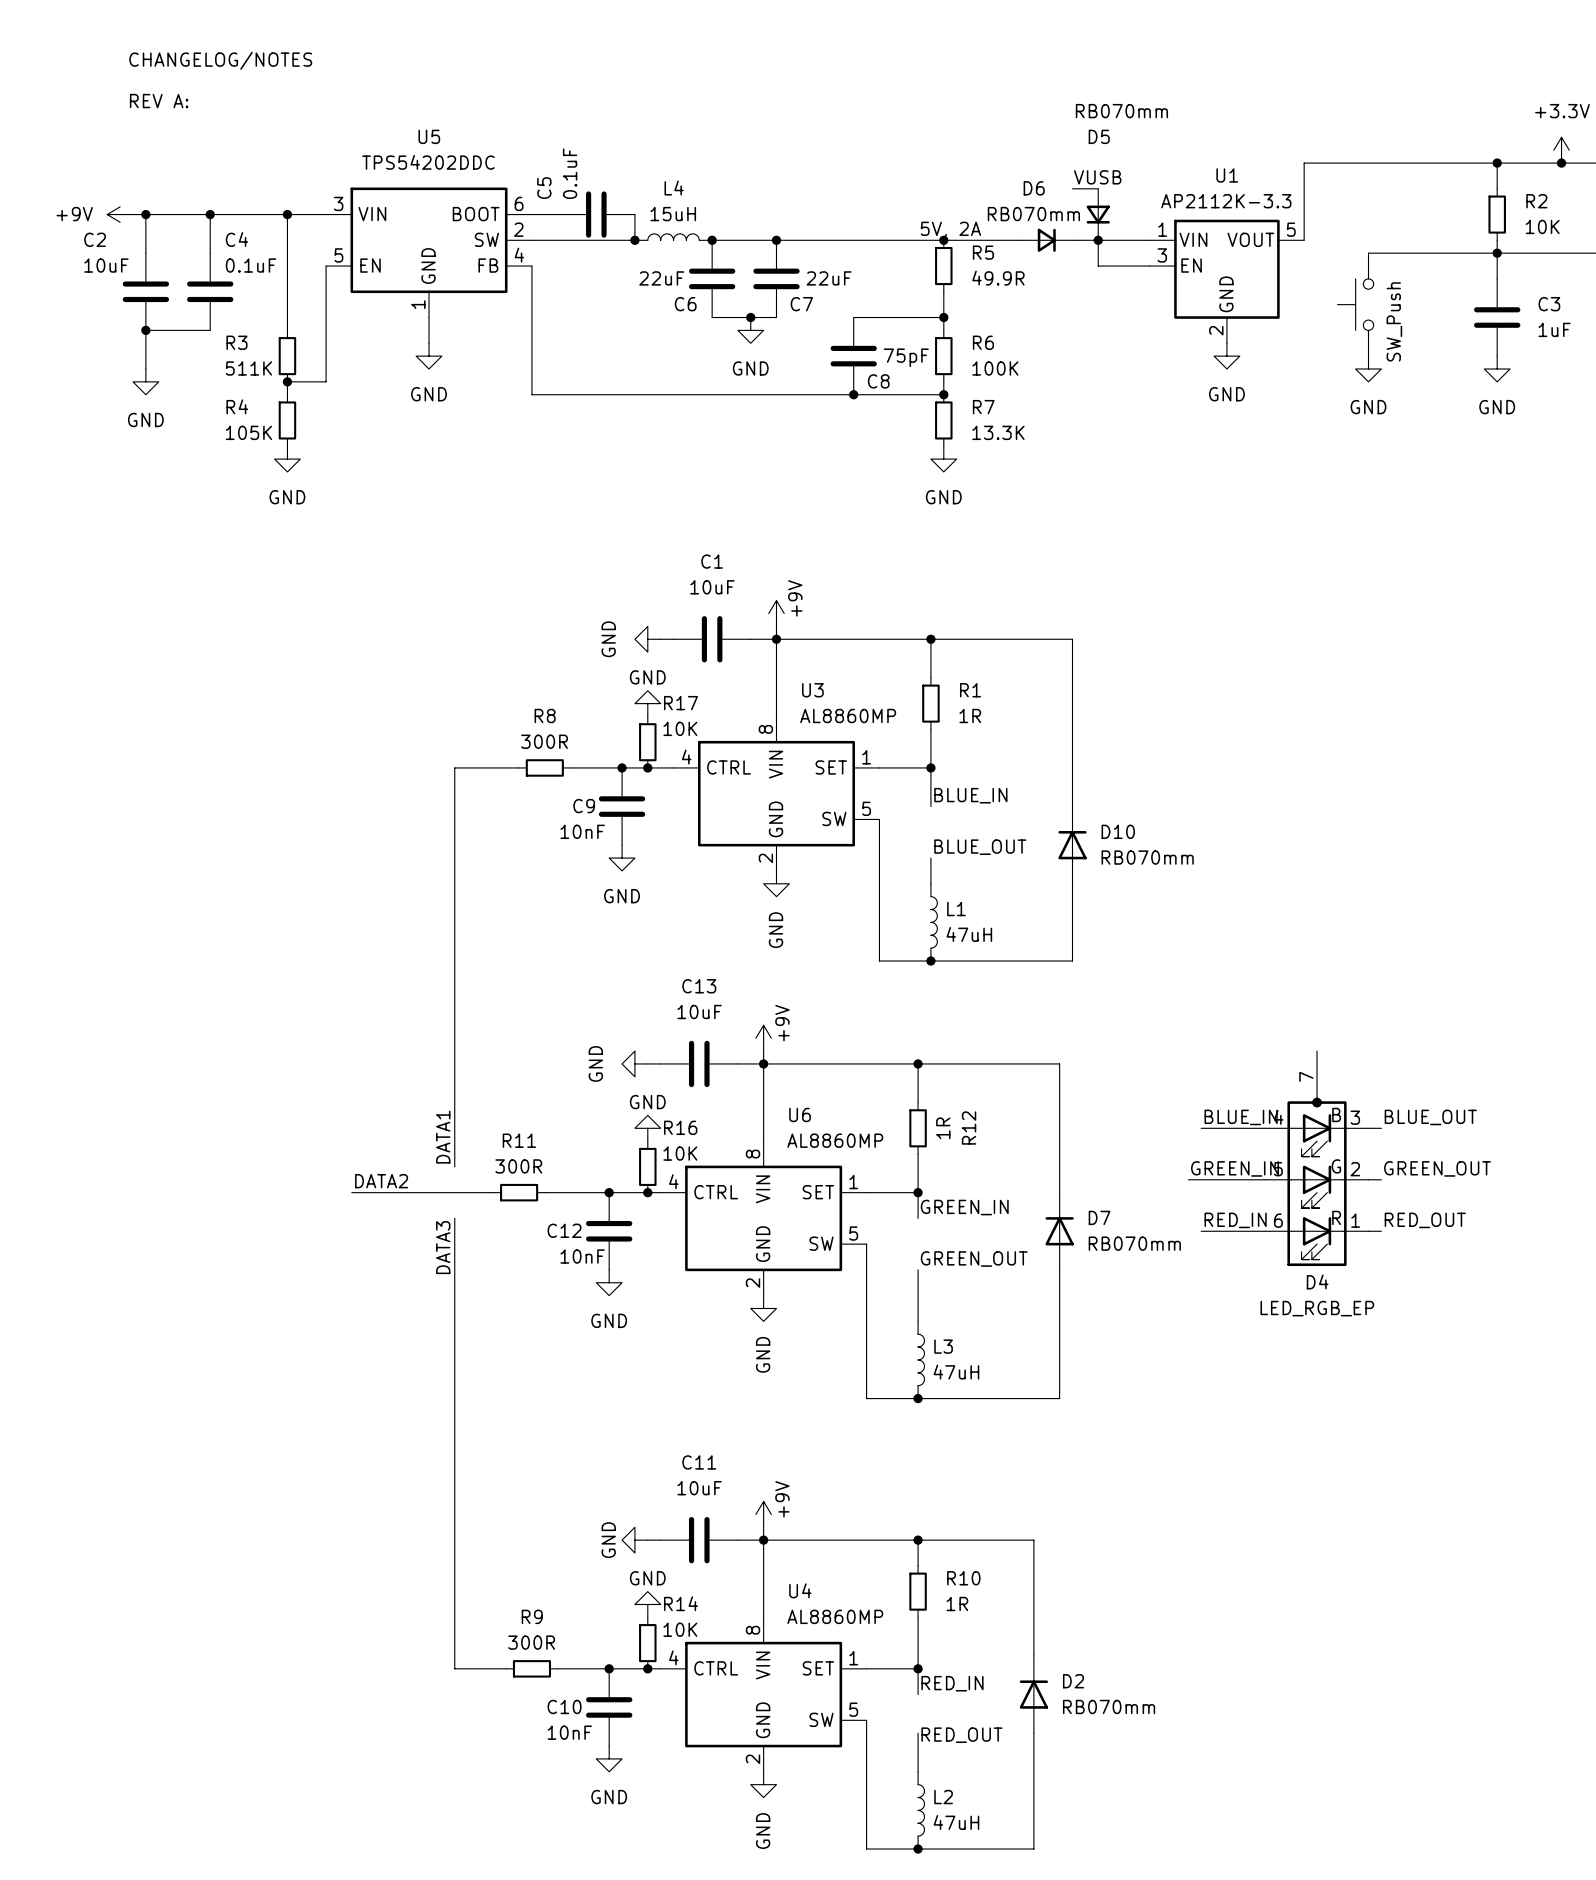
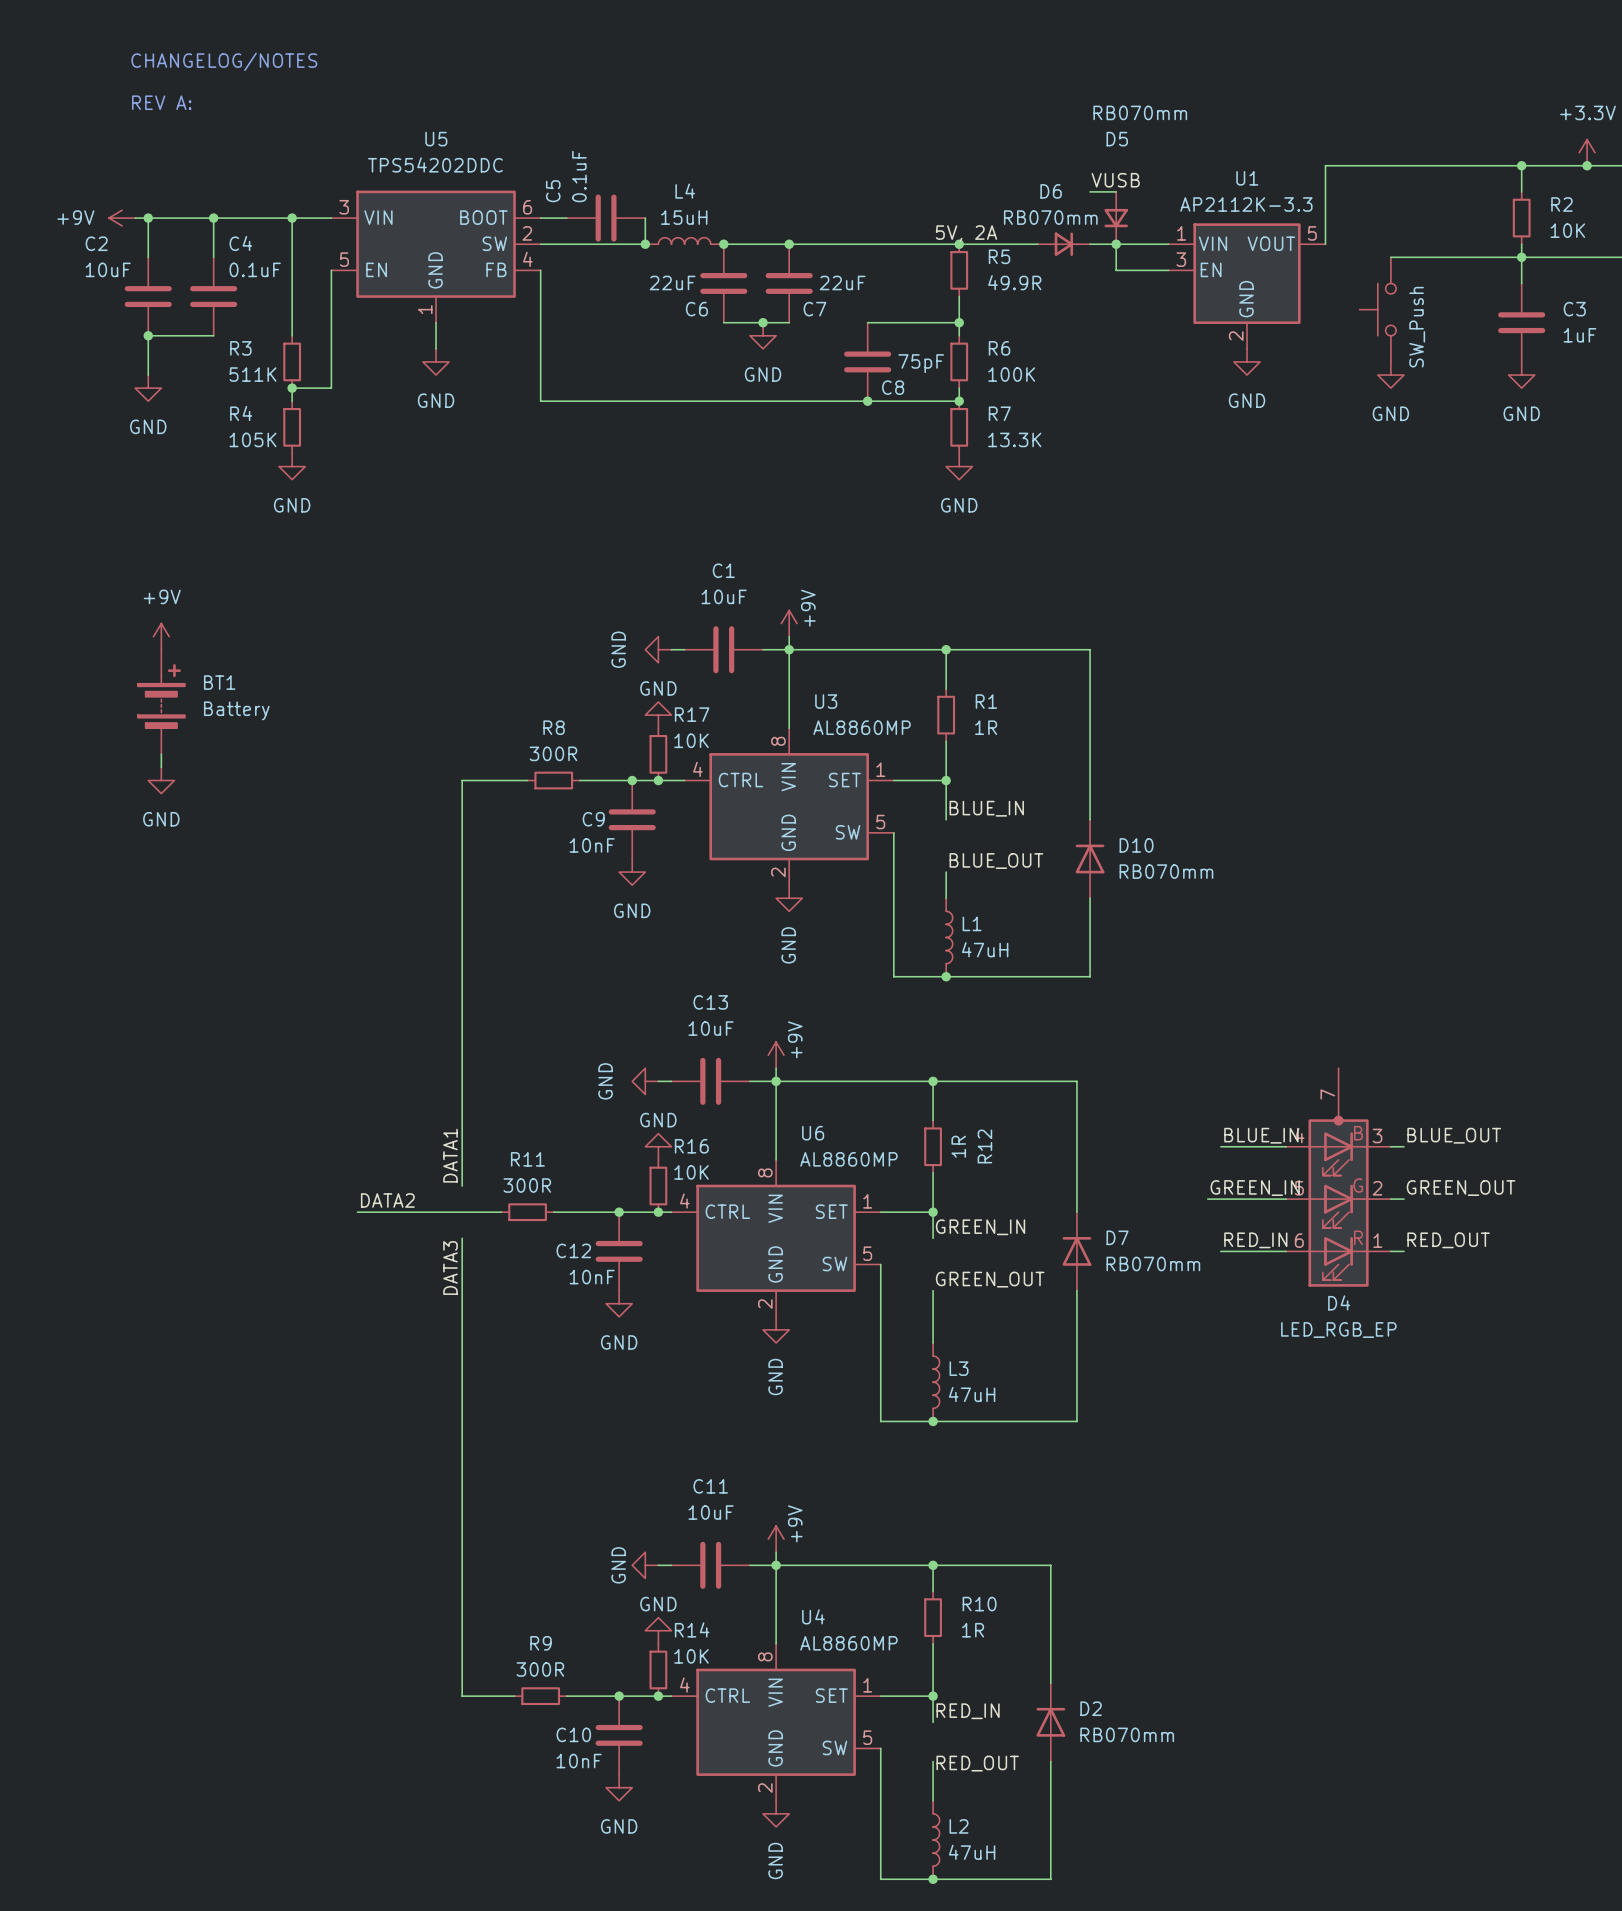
power symbol: none -> +9V (161, 636)
BT1: none -> Battery (161, 702)
wire: none -> (161, 754) (161, 767)
power symbol: none -> GND (161, 780)

